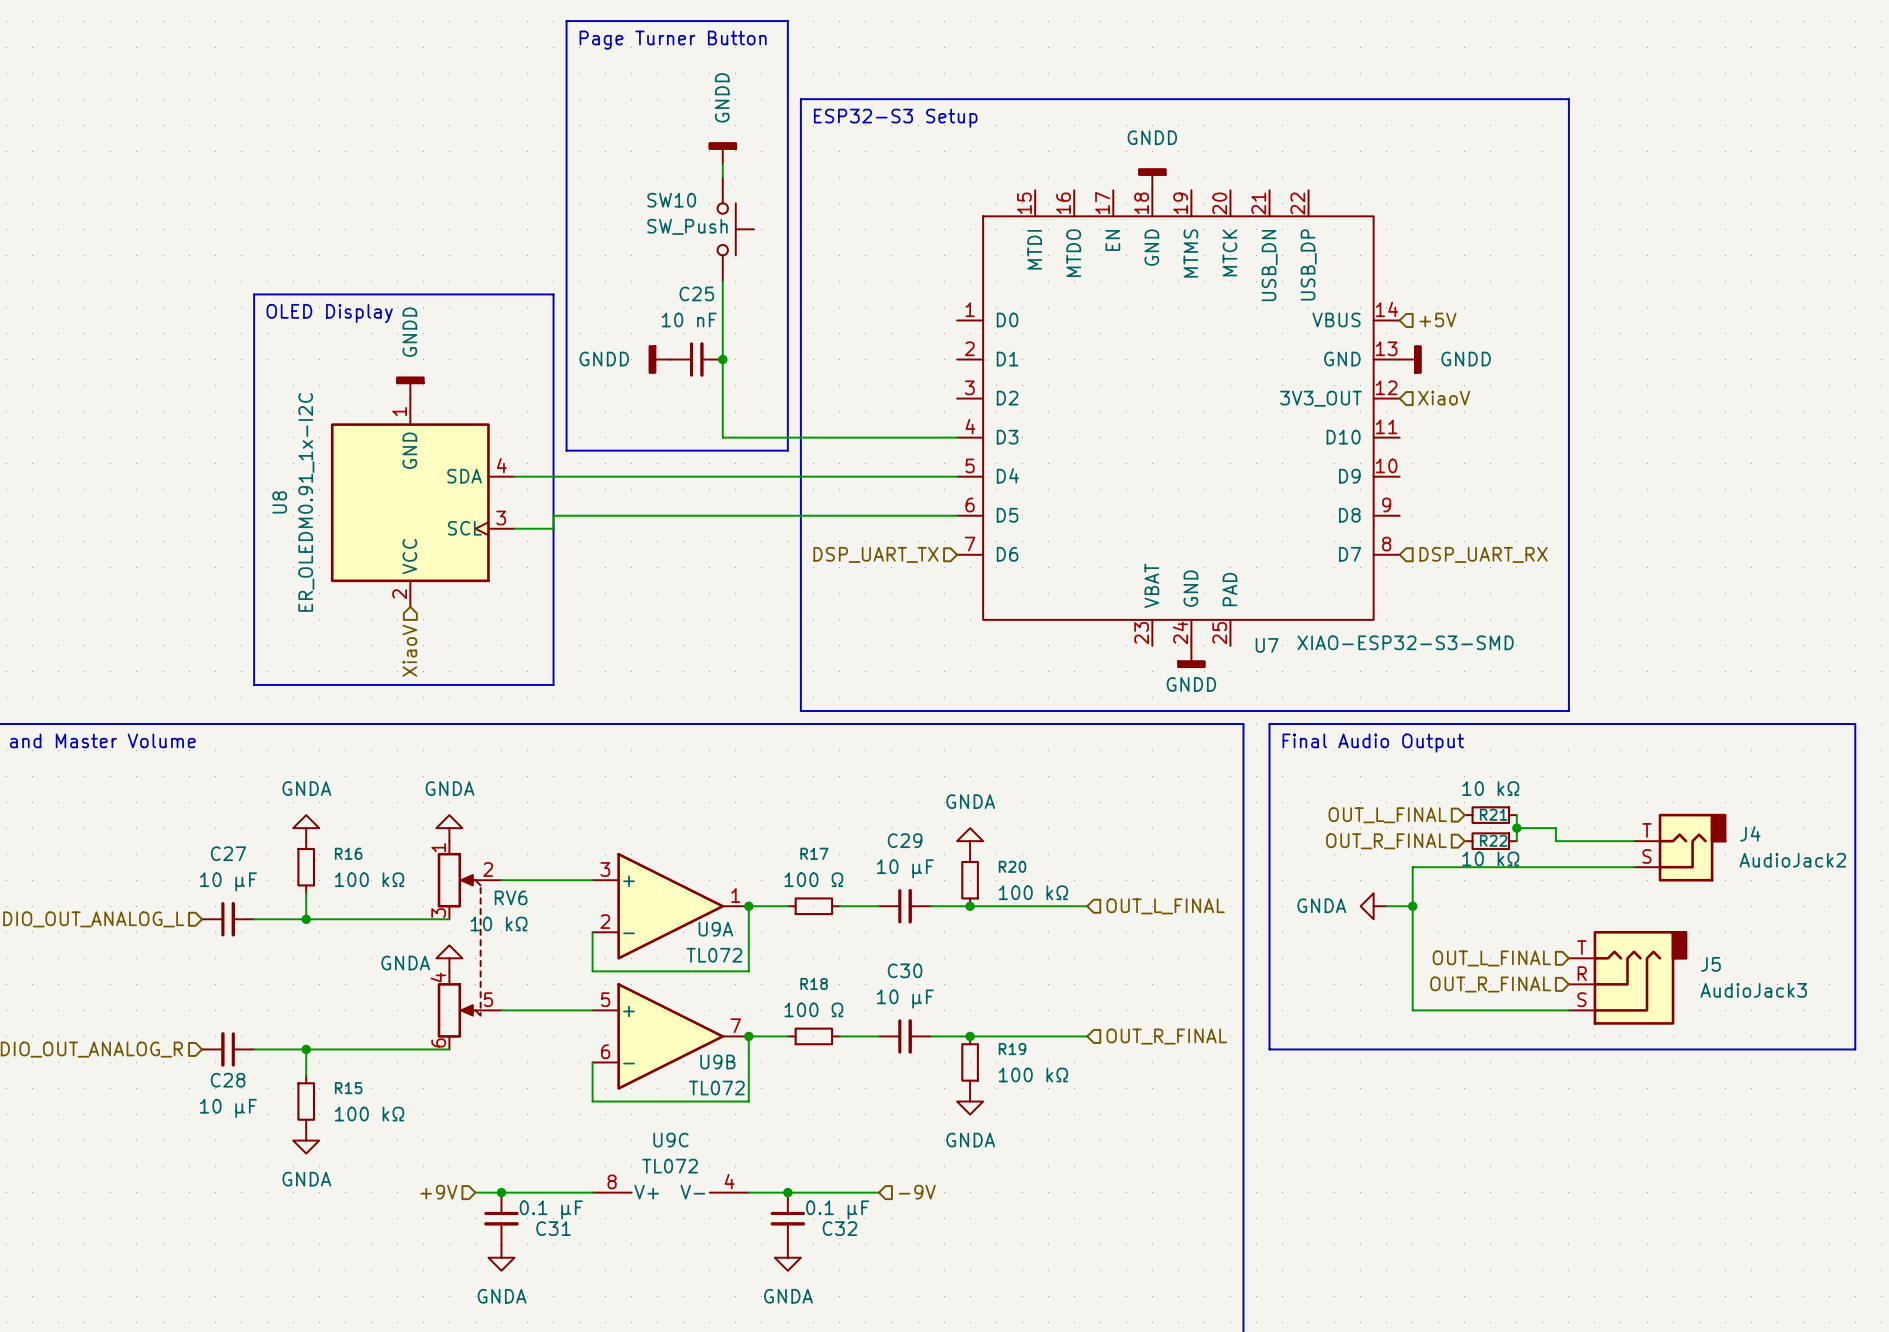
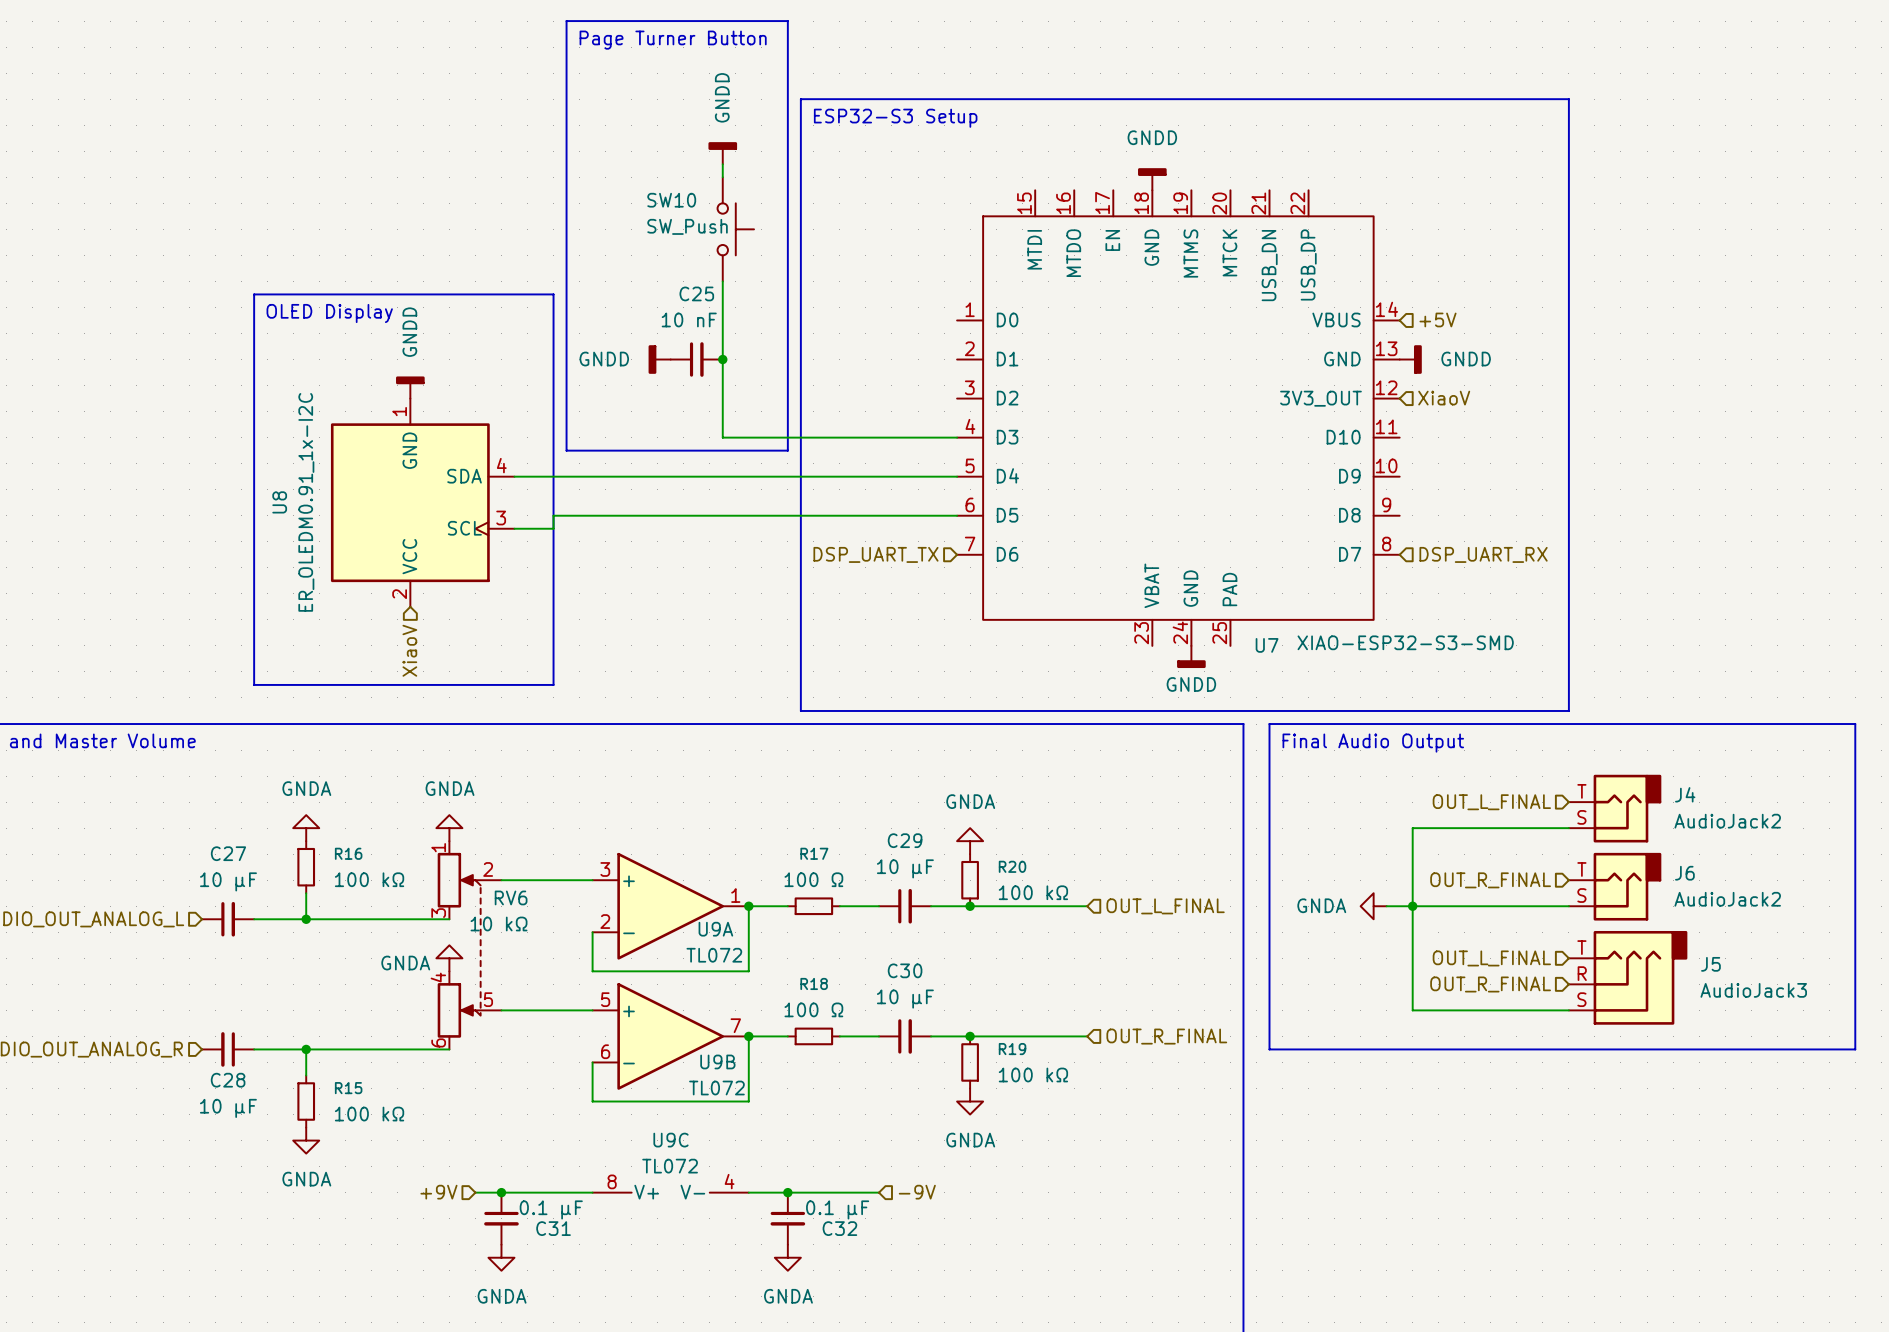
hierarchical label position: OUT_L_FINAL (1387, 815) -> OUT_L_FINAL (1491, 802)
R21: 10 kΩ (1490, 815) -> none
wire: (1516, 815) (1516, 841) -> none
junction: (1516, 828) -> none
wire: (1555, 828) (1555, 841) (1633, 841) -> (1555, 828) (1568, 828)
hierarchical label position: OUT_R_FINAL (1386, 841) -> OUT_R_FINAL (1490, 880)
R22: 10 kΩ (1490, 841) -> none
J4 position: (1680, 847) -> (1615, 808)
wire: (1412, 867) (1633, 867) -> (1412, 867) (1412, 828) (1516, 828)
J6: none -> AudioJack2 (1615, 886)
wire: none -> (1412, 906) (1568, 906)

